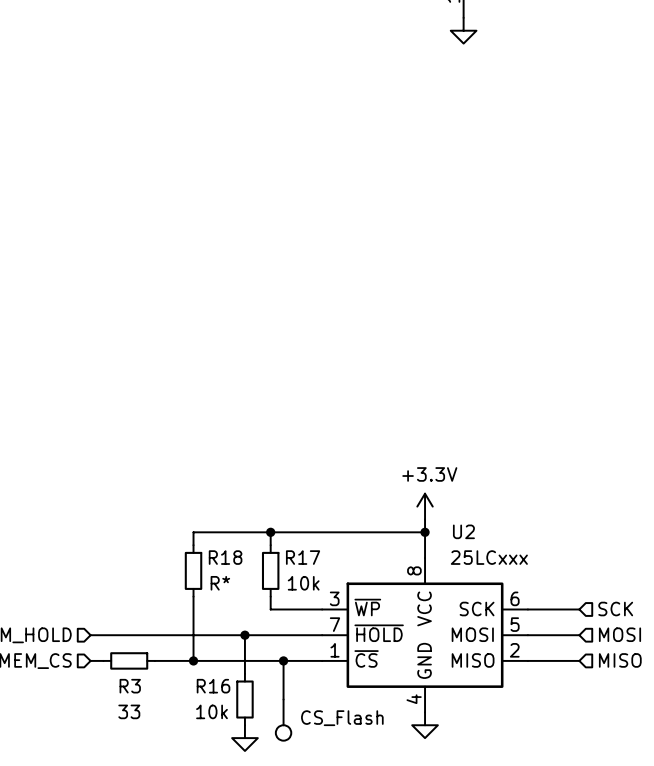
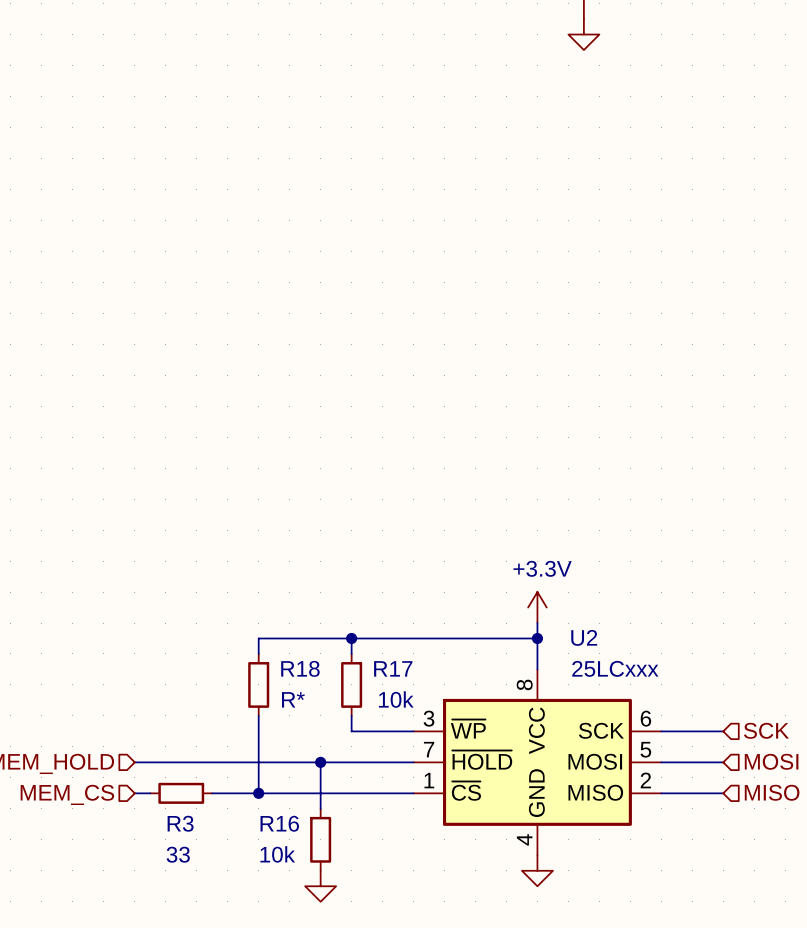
wire: (283, 660) (283, 699) -> none
junction: (283, 660) -> none
part: CS_Flash (283, 720) -> none

